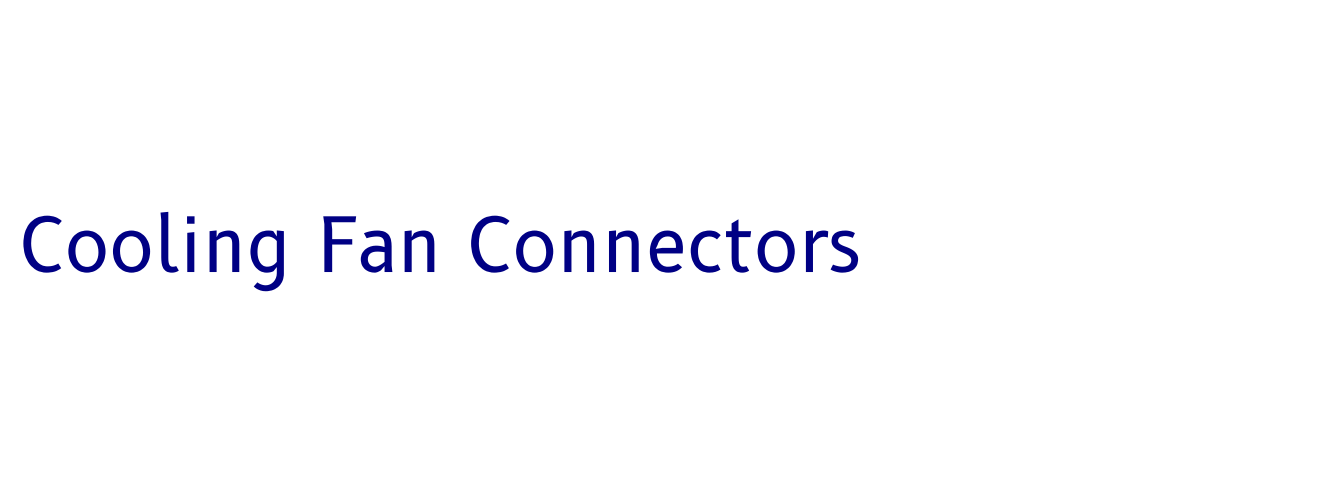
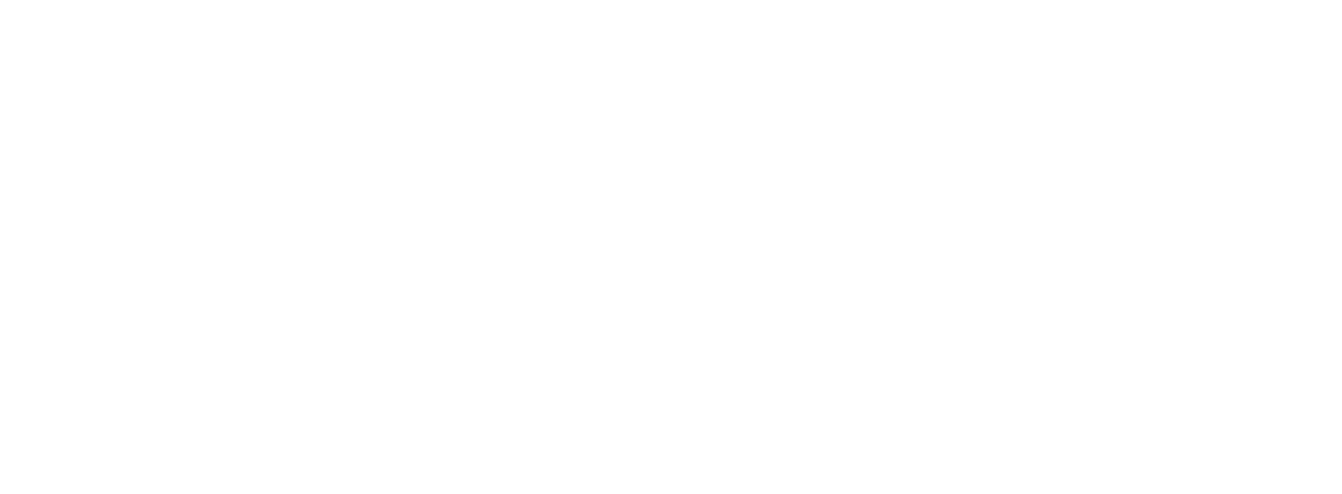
text: Cooling Fan Connectors (440, 251) -> none

